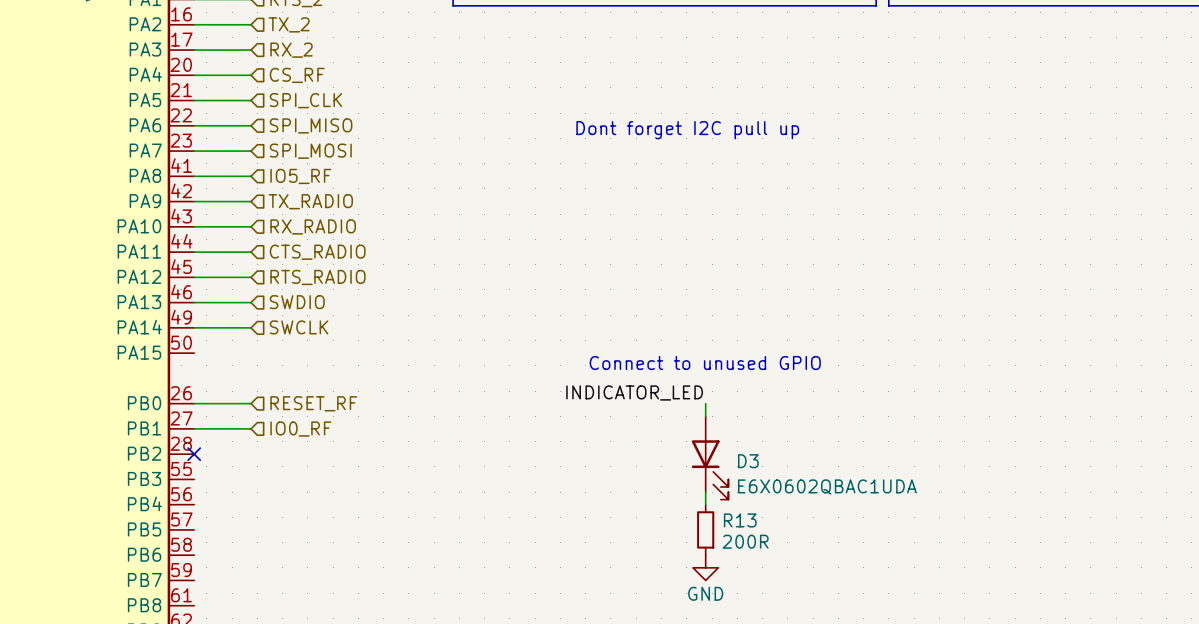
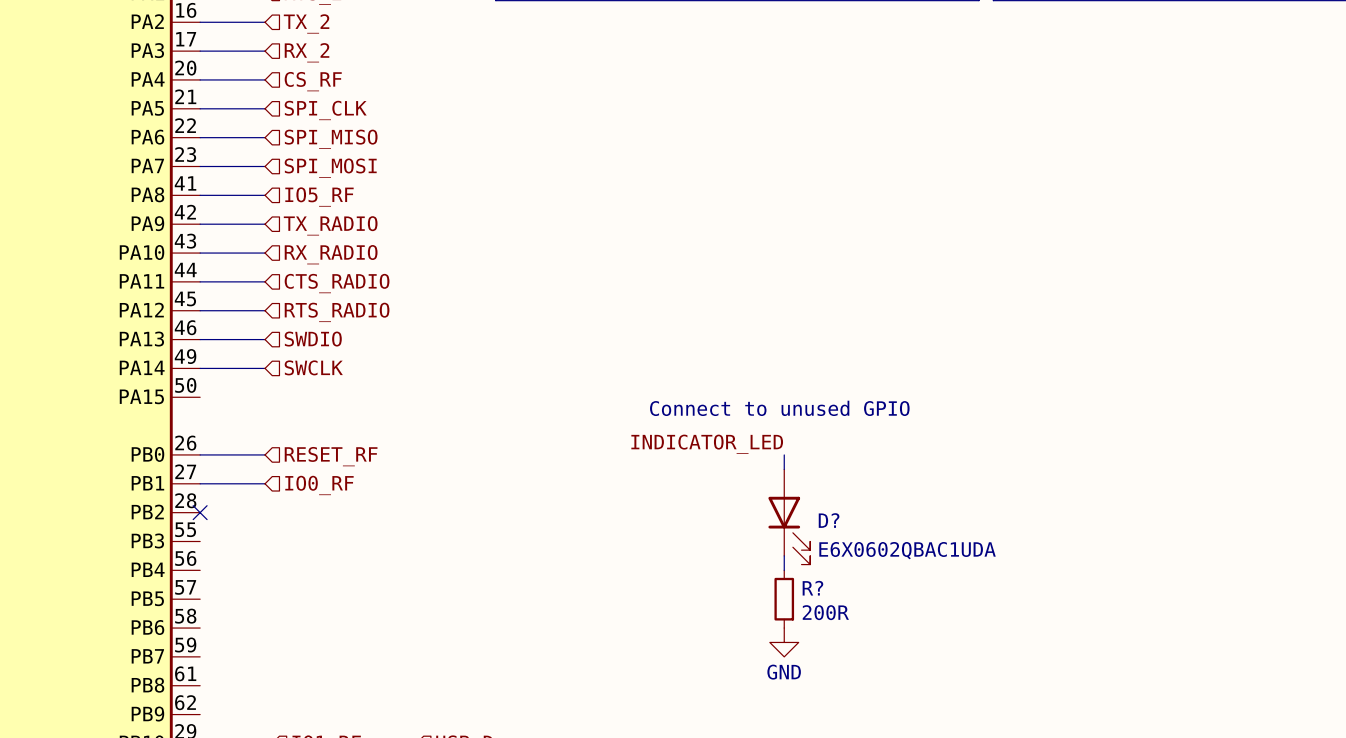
text: Dont forget I2C pull up (687, 130) -> none
D3 name: D3 (748, 461) -> D? (829, 520)
R13 name: R13 (740, 520) -> R? (812, 588)

